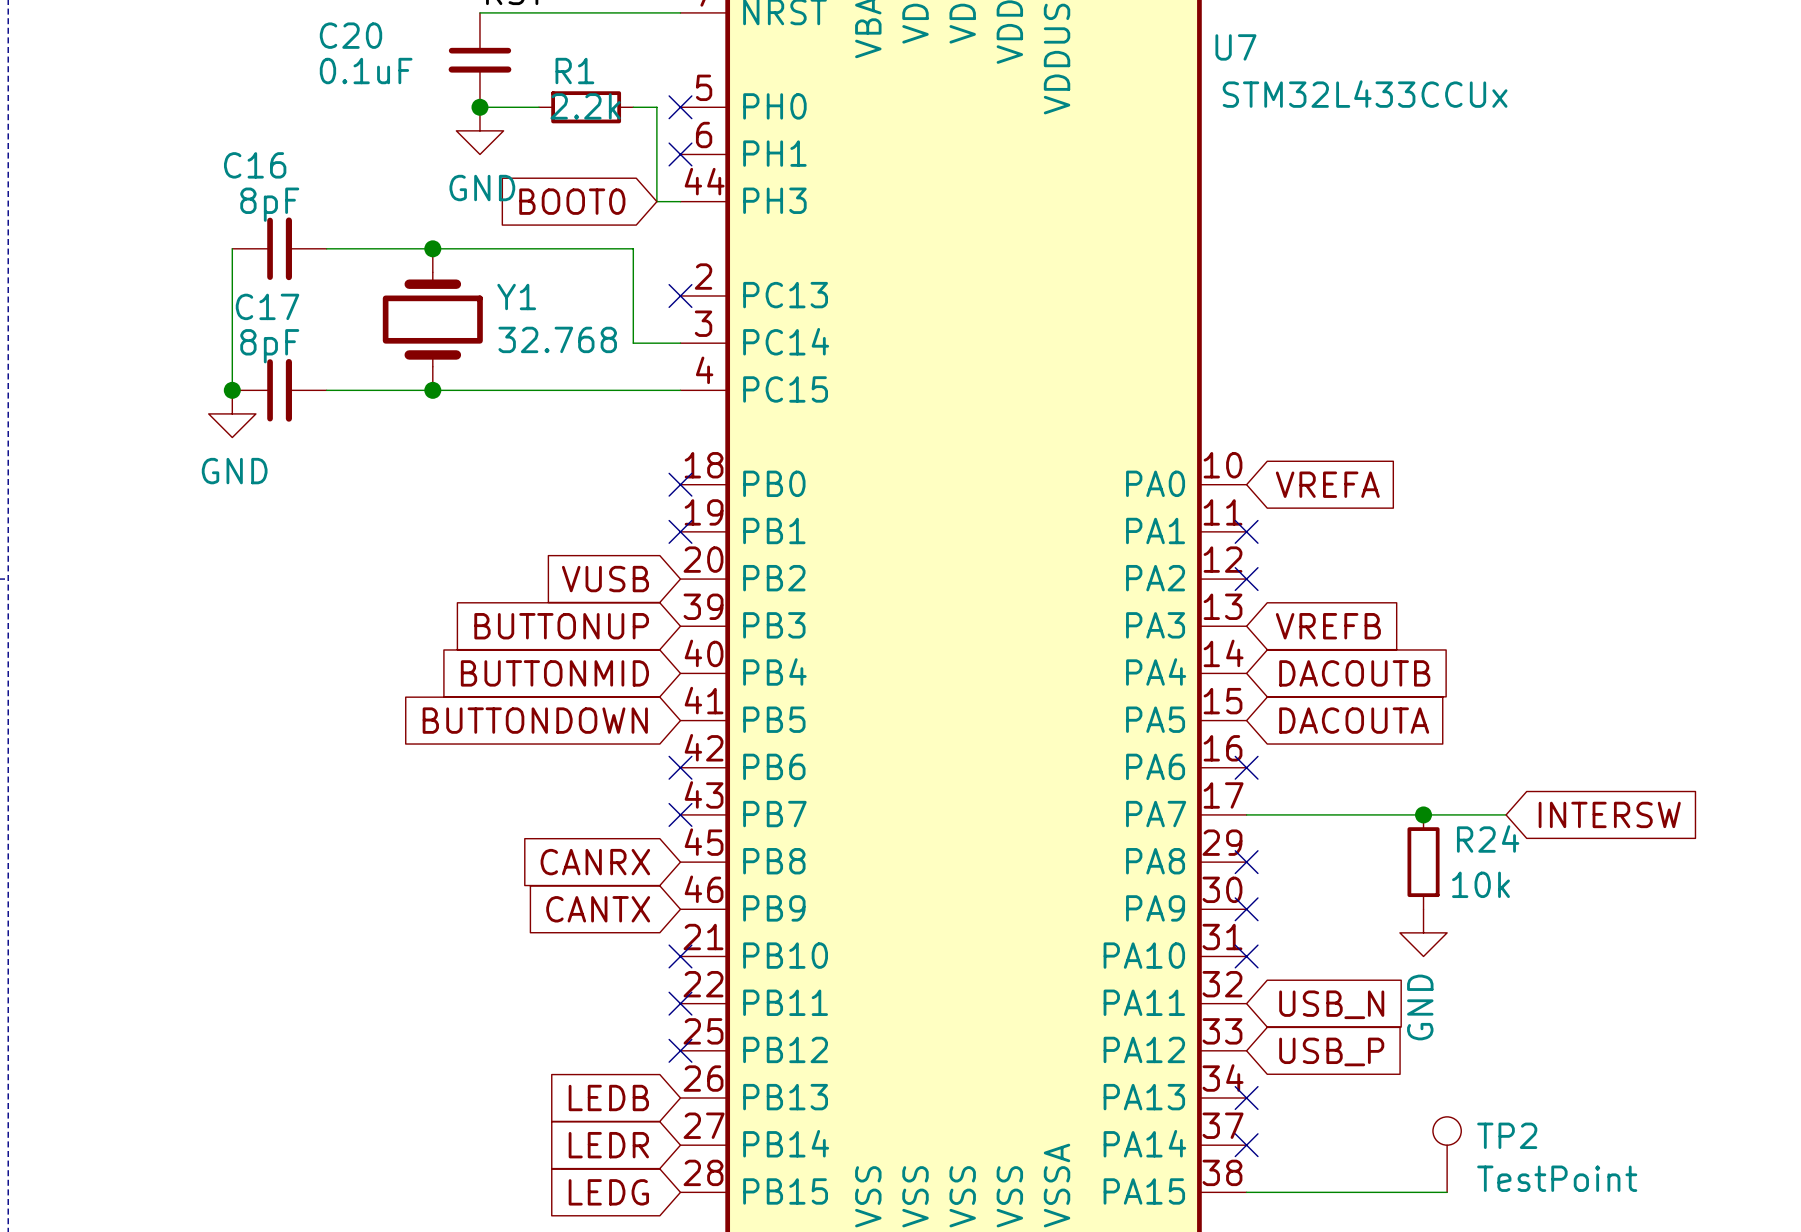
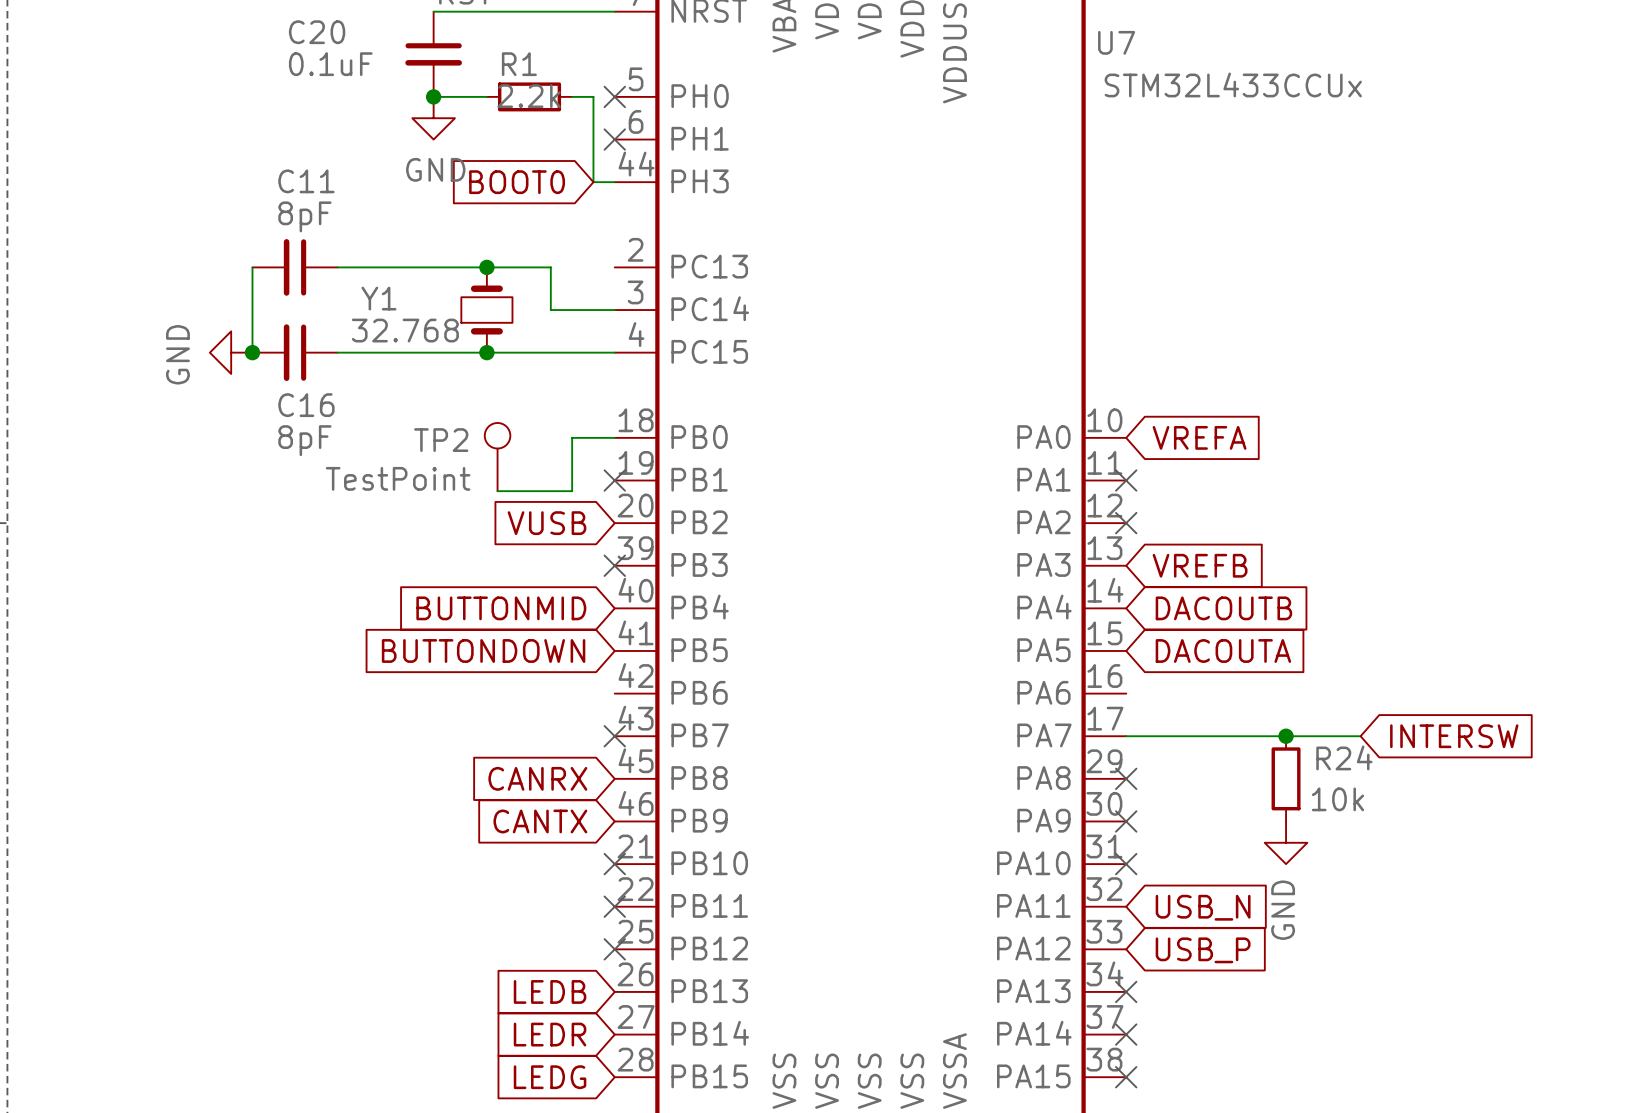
C16 value position: 8pF (269, 204) -> 8pF (304, 440)
wire: (232, 248) (232, 390) -> none
C16 rotation: 0° (279, 248) -> 180° (295, 352)
C16 position: (279, 248) -> (295, 352)
wire: (326, 248) (633, 248) (633, 343) -> (337, 267) (550, 267) (550, 310) (572, 310)
Y1 symbol: [382, 248, 483, 391] -> [461, 267, 513, 353]
junction: (432, 248) -> none
wire: none -> (252, 267) (252, 352)
C11: none -> 8pF (295, 267)
junction: none -> (486, 267)
no-connect mark: (680, 295) -> none
Y1 name position: Y1 (516, 297) -> Y1 (378, 298)
Y1 value position: 32.768 (557, 339) -> 32.768 (405, 330)
junction position: (232, 390) -> (252, 352)
C17: 8pF (279, 390) -> none
junction: (432, 390) -> none
junction: none -> (486, 352)
power symbol rotation: 0° (232, 413) -> 90° clockwise (231, 352)
power symbol position: GND (232, 413) -> GND (231, 352)
wire: none -> (614, 437) (572, 437) (572, 491) (497, 491)
no-connect mark: (680, 484) -> none
global label: BUTTONUP (561, 626) -> none
no-connect mark: none -> (614, 565)
no-connect mark: (680, 767) -> none
no-connect mark: (1246, 767) -> none
TP2 name position: TP2 (1507, 1135) -> TP2 (441, 440)
TP2 position: (1447, 1154) -> (497, 457)
TP2 value position: TestPoint (1557, 1178) -> TestPoint (398, 478)
wire: (1246, 1192) (1447, 1192) -> none
no-connect mark: none -> (1126, 1077)

